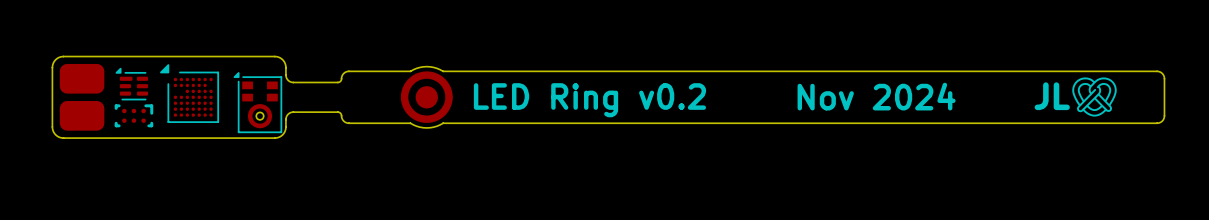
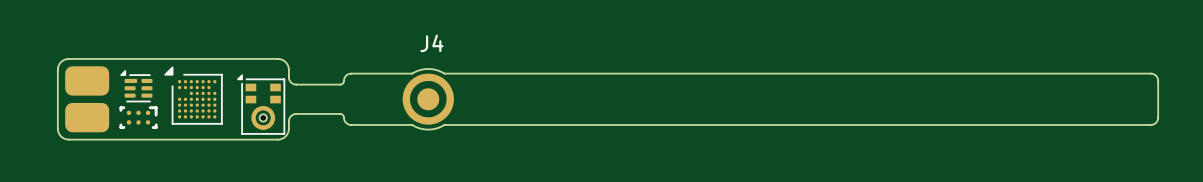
J4 name: none -> J4 (431, 43)
drawing: [1072, 77, 1117, 117] -> none
text: Nov 2024 (876, 96) -> none
text: JL (1052, 96) -> none
text: LED Ring v0.2 (589, 100) -> none

